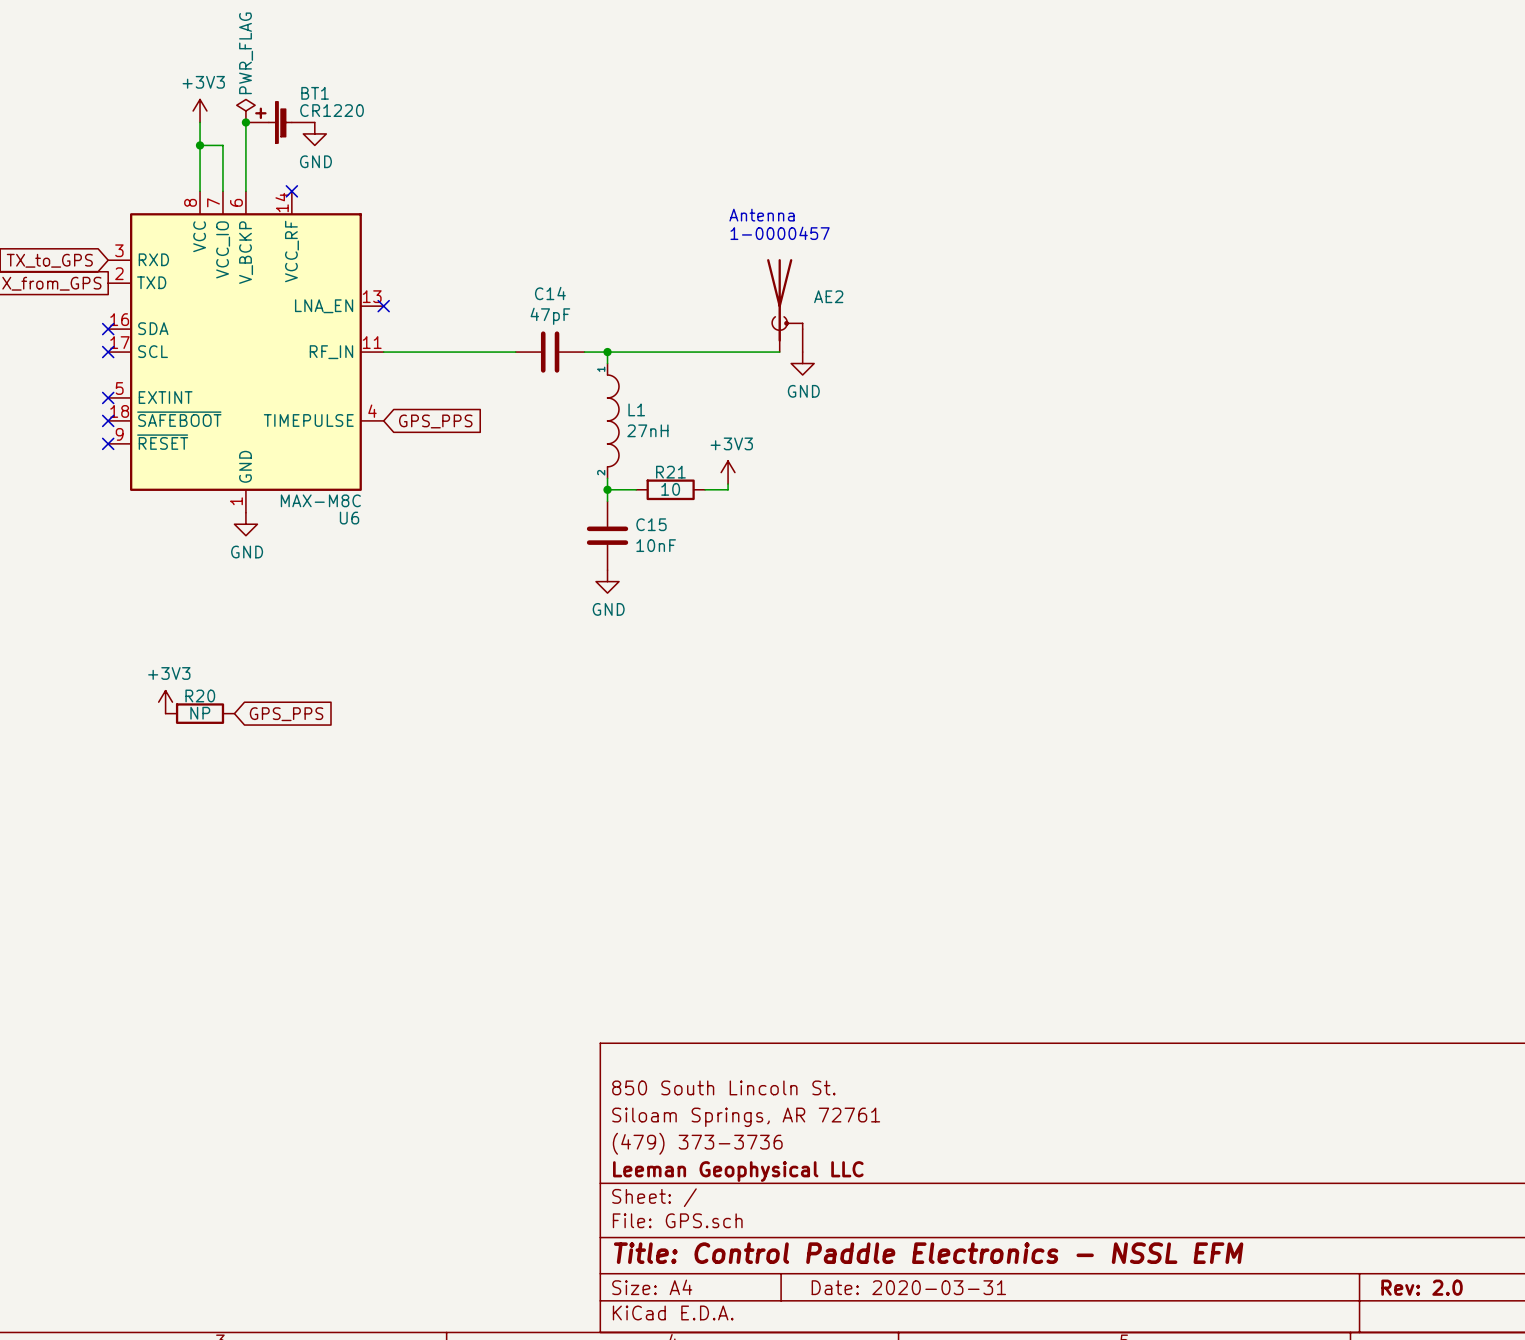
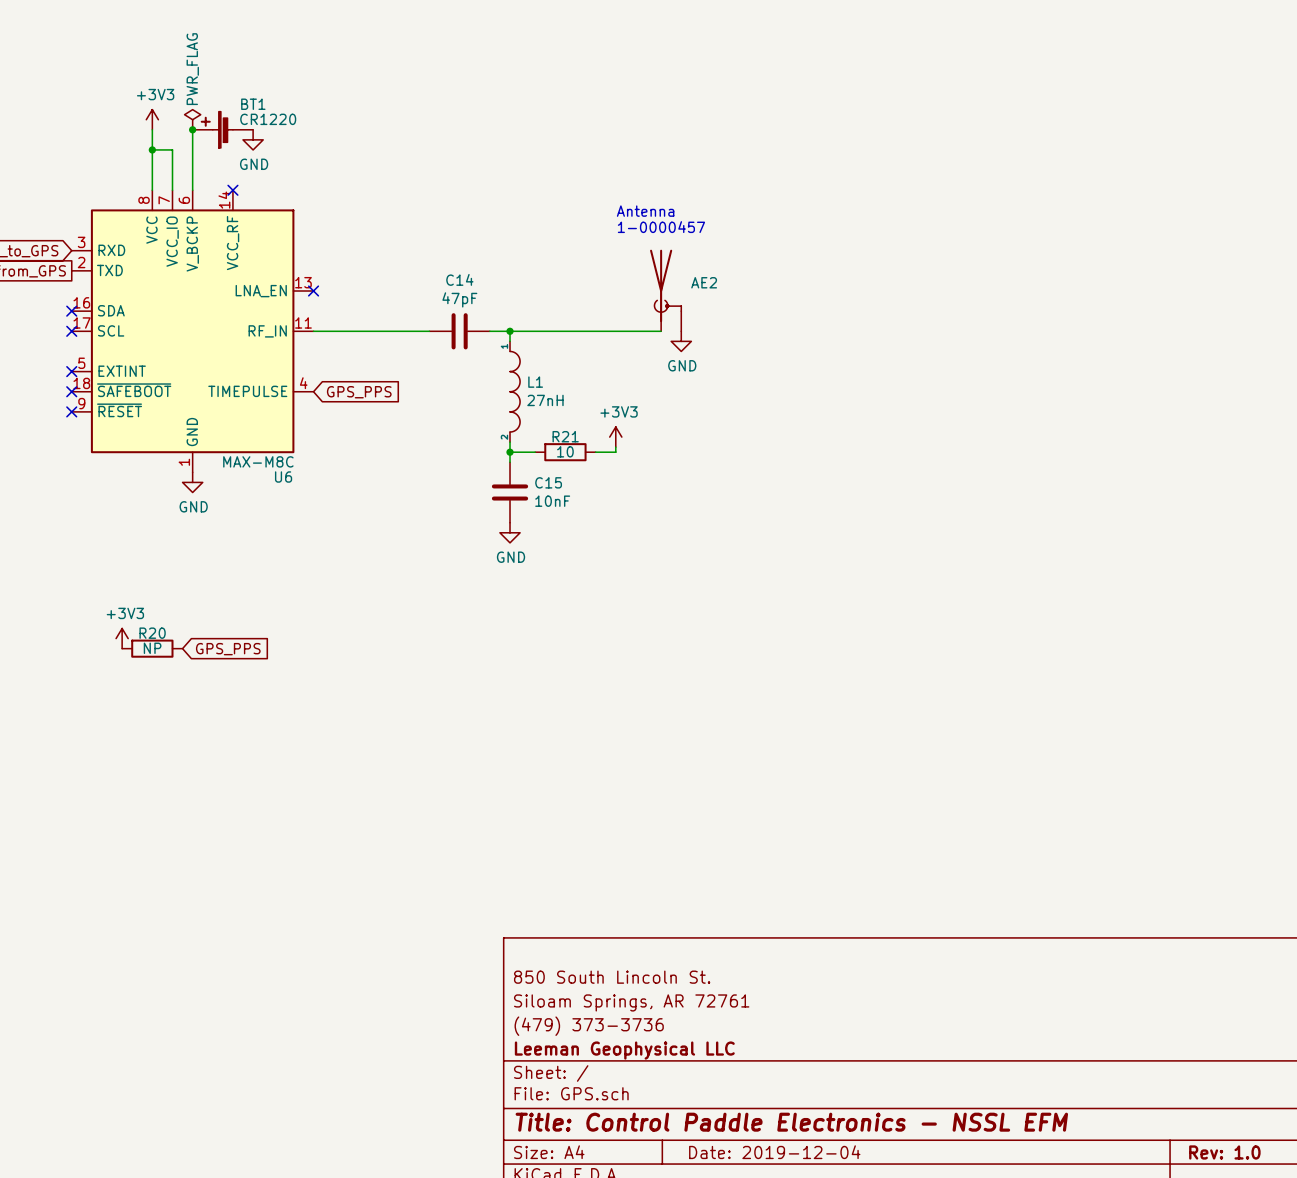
title block: Date: 2020-03-31 (908, 1287) -> Date: 2019-12-04 (774, 1152)
title block: Rev: 2.0 (1422, 1287) -> Rev: 1.0 (1224, 1152)

